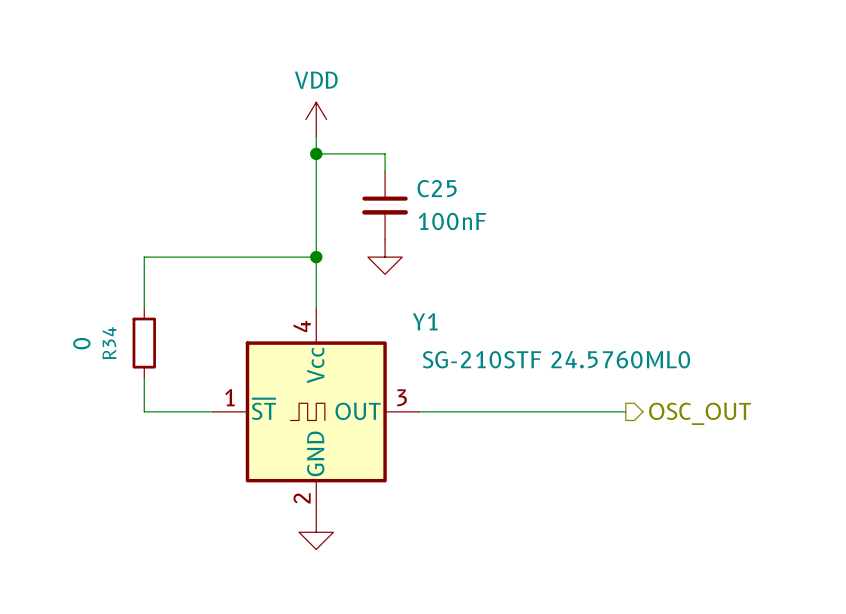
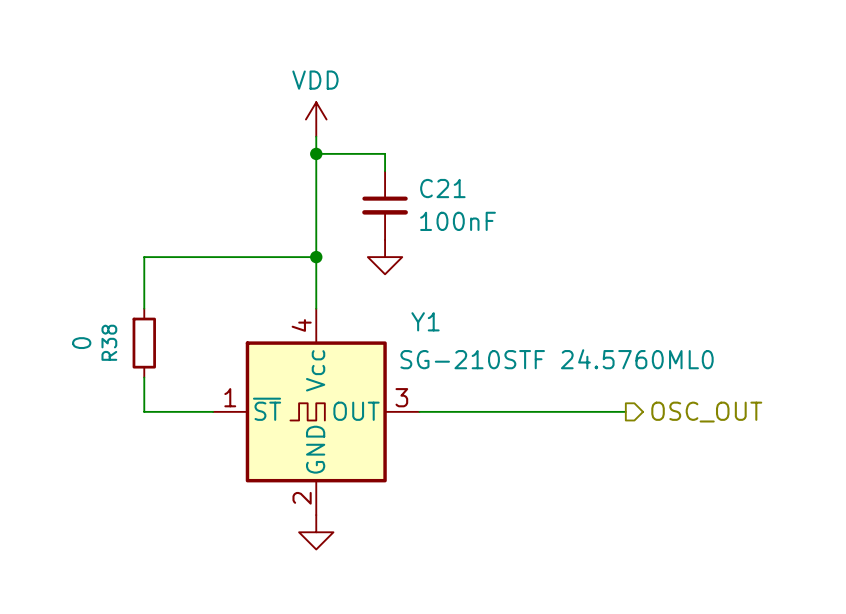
C25 name: C25 (437, 188) -> C21 (442, 188)
R34 name: R34 (109, 343) -> R38 (109, 342)

